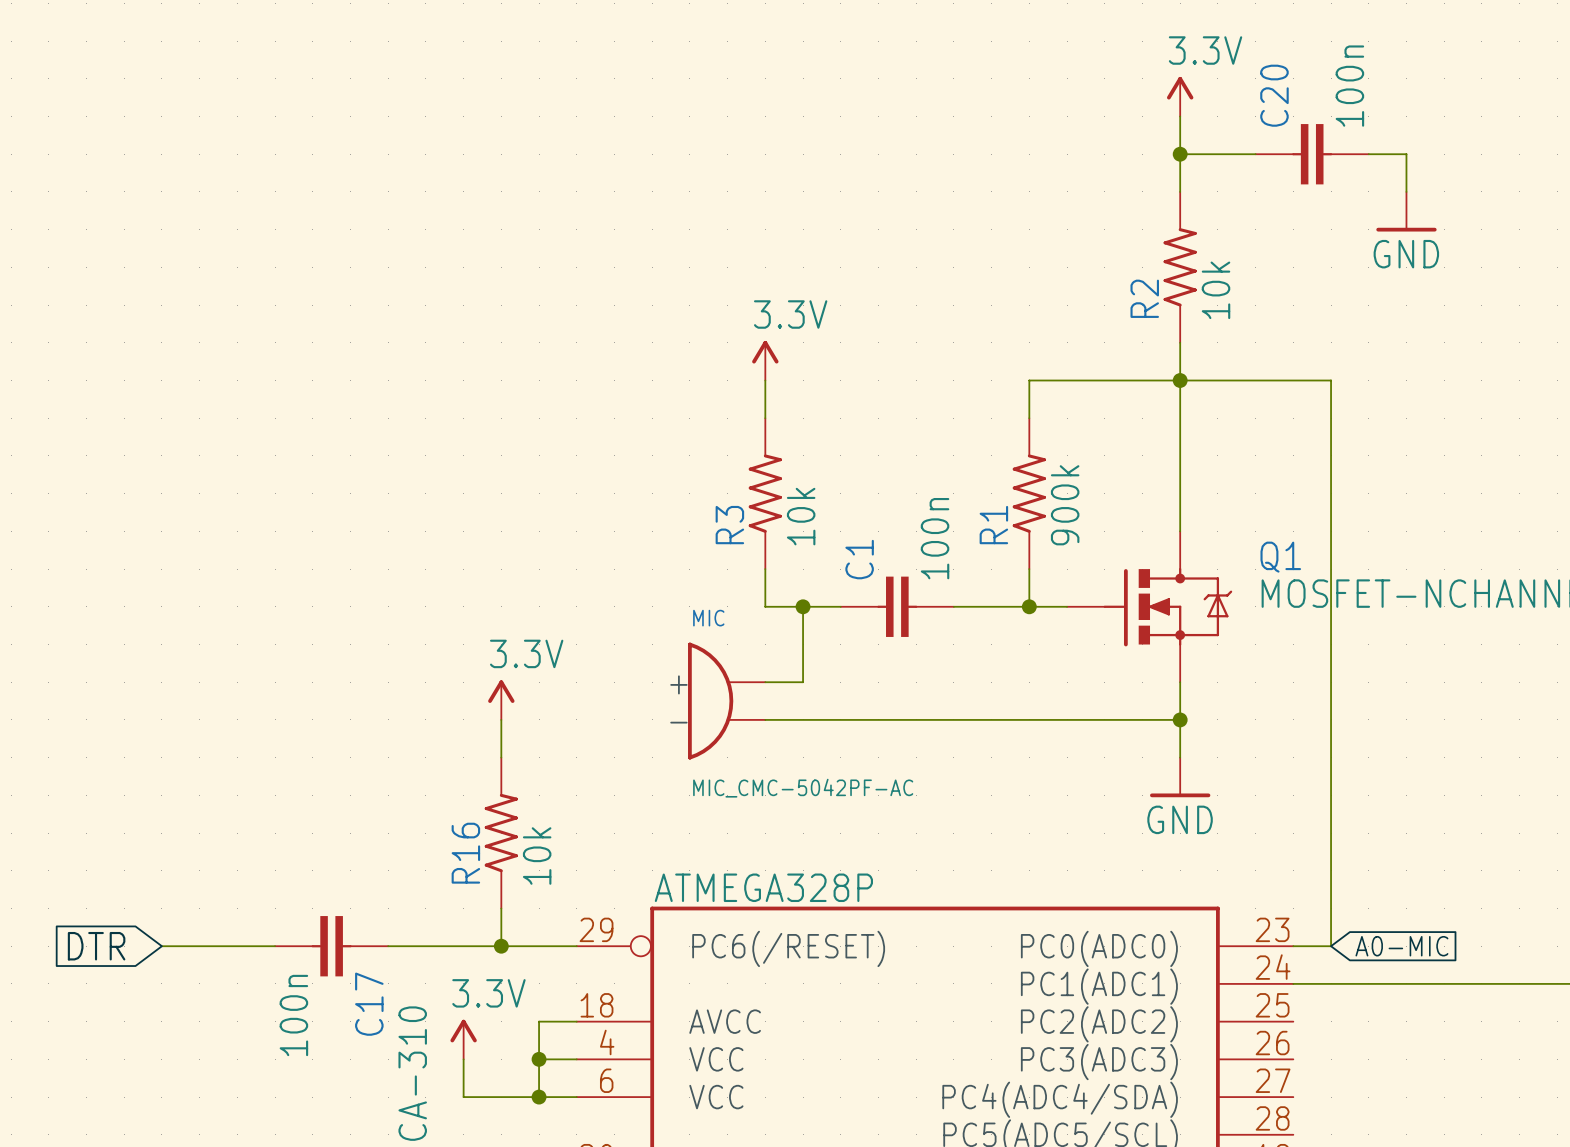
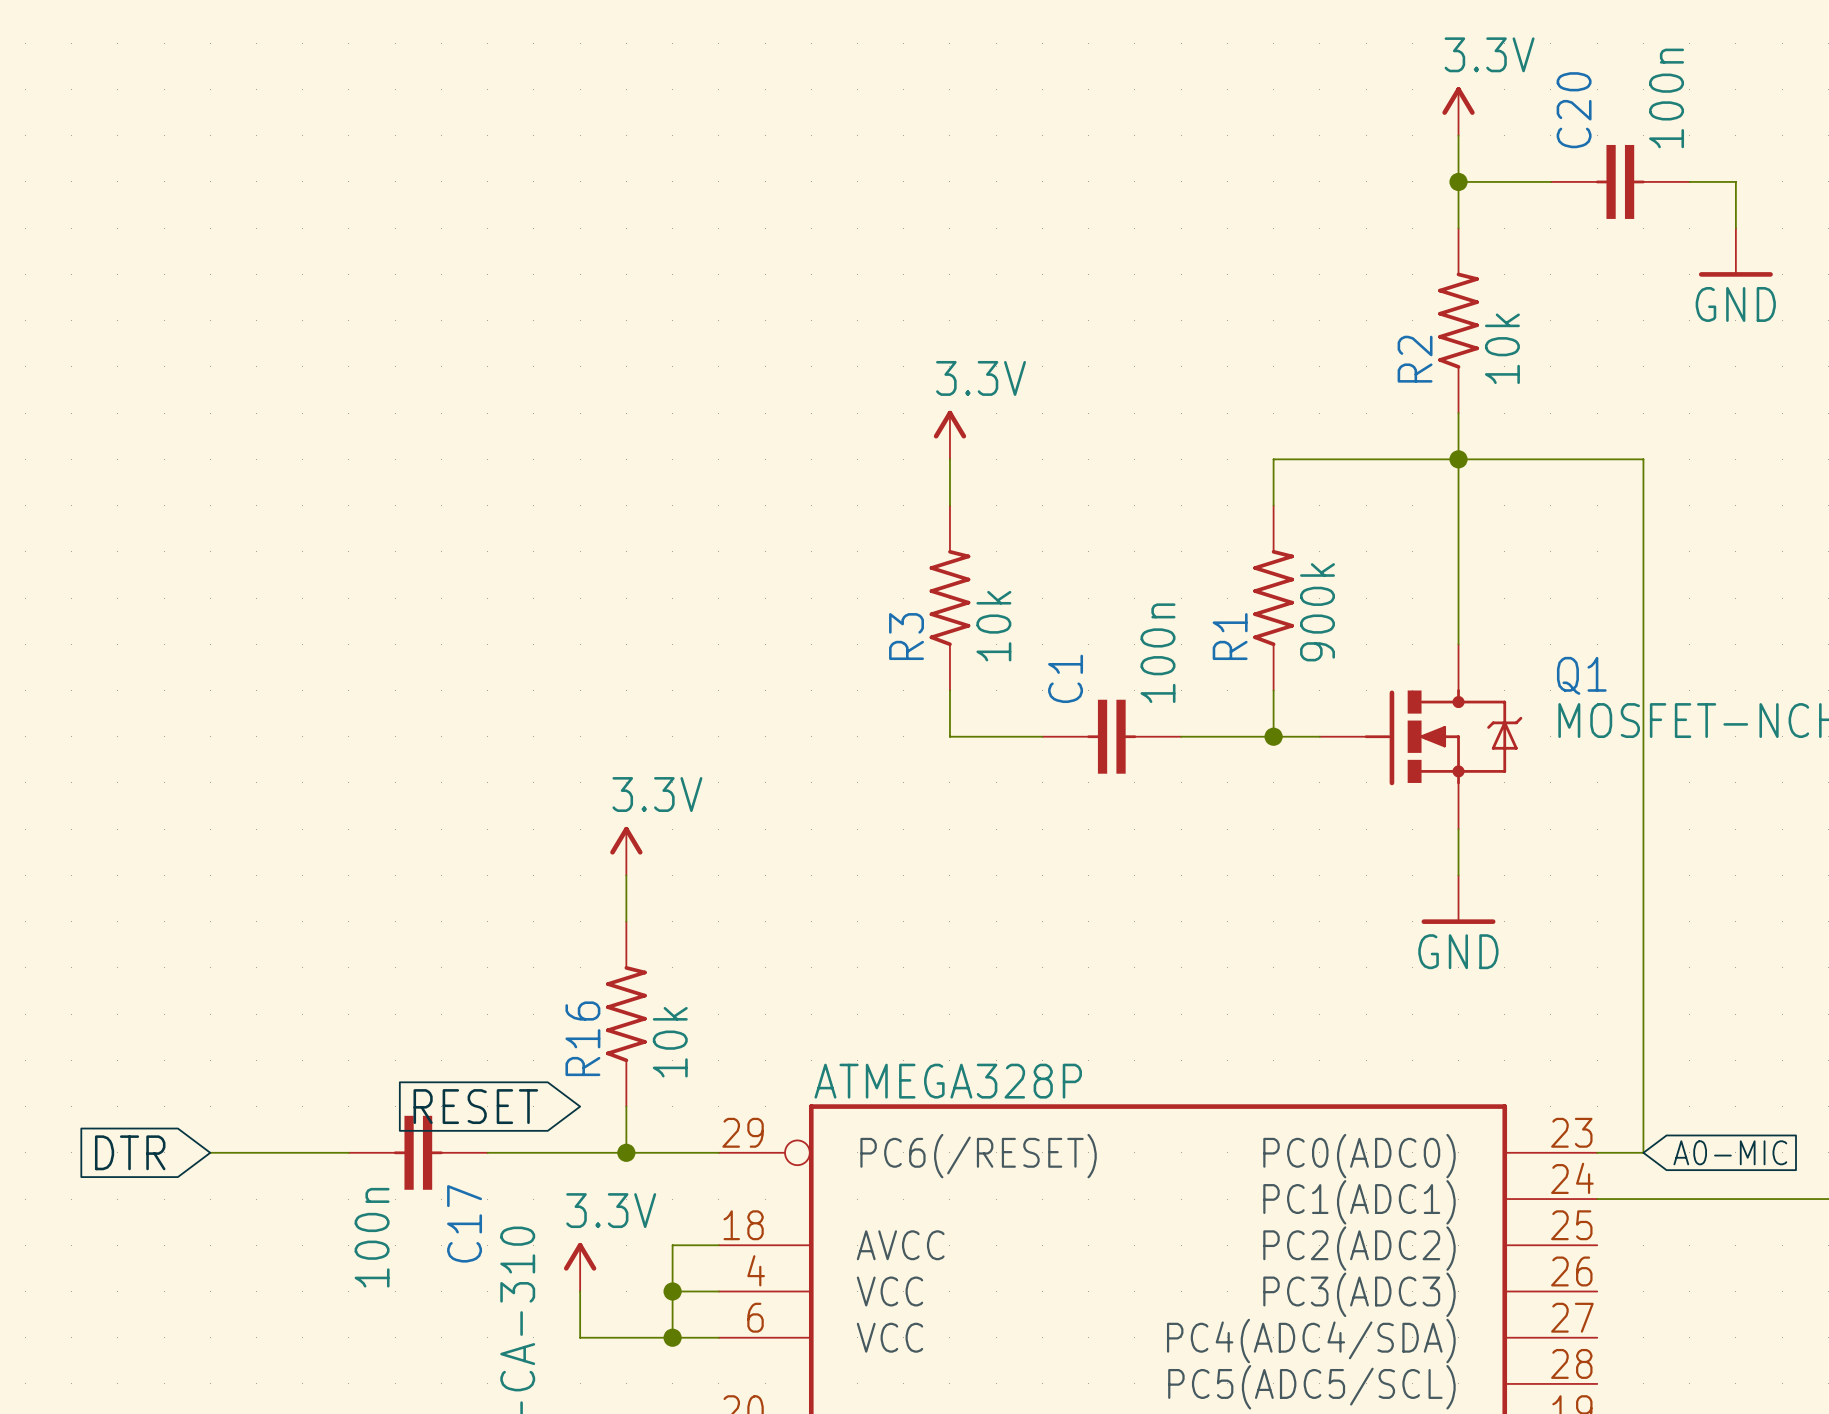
wire: (803, 606) (803, 682) (765, 682) -> none
junction: (803, 606) -> none
MIC: MIC_CMC-5042PF-AC (726, 701) -> none
wire: (765, 719) (1180, 719) (1180, 757) -> none
junction: (1180, 719) -> none
power symbol position: GND (1180, 777) -> GND (1458, 899)
global label: none -> RESET (475, 1106)

